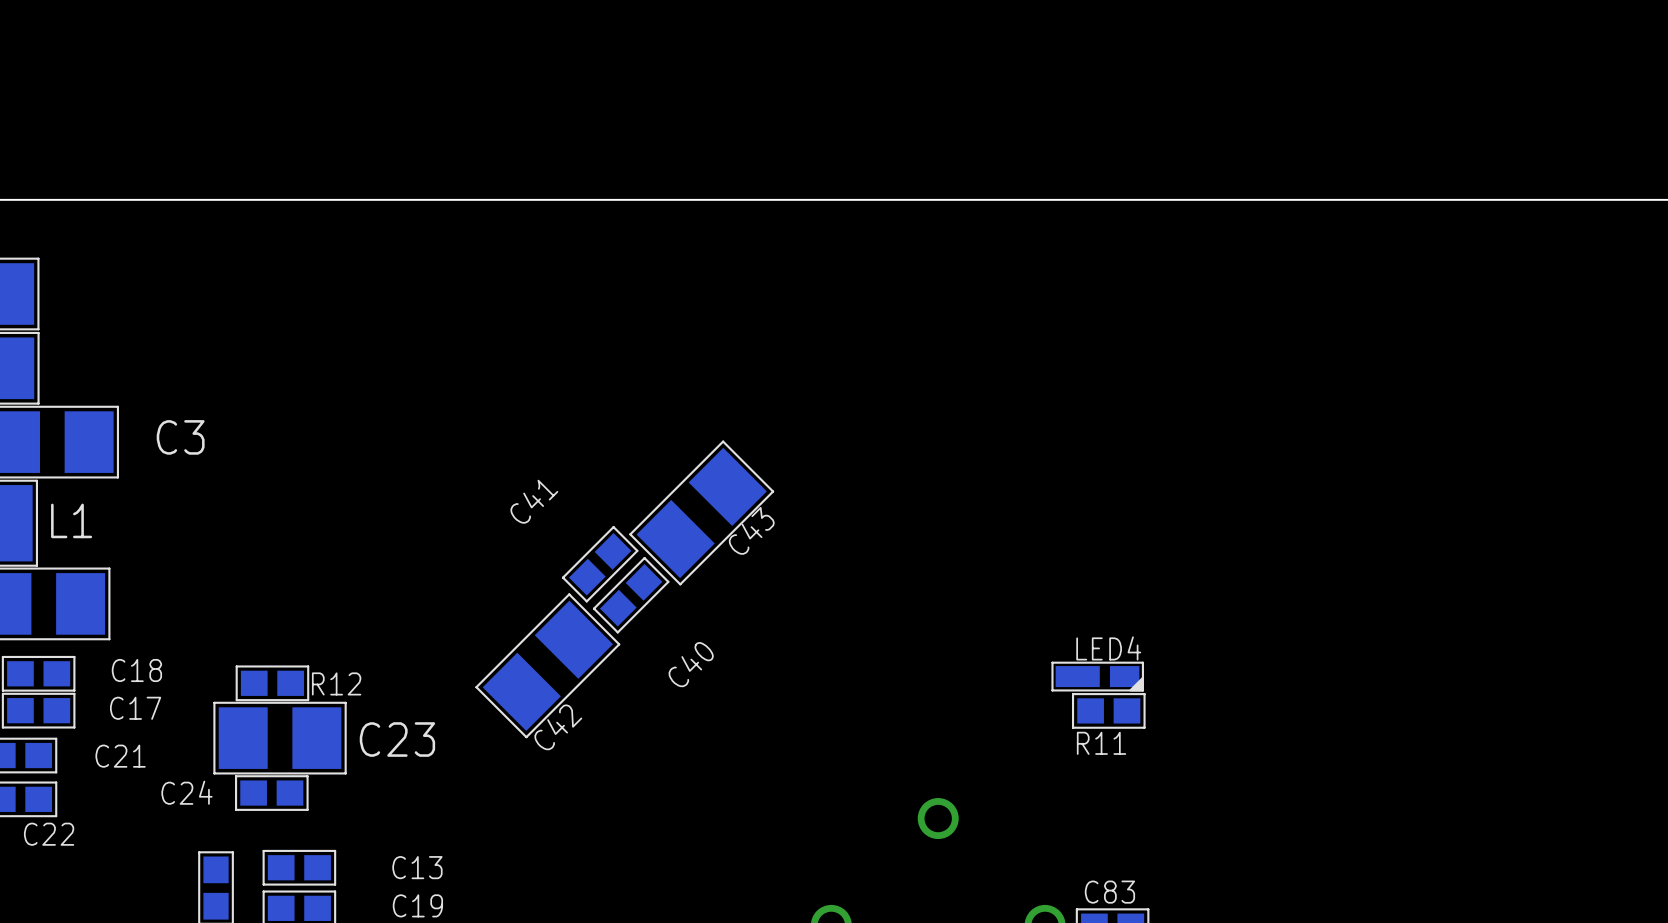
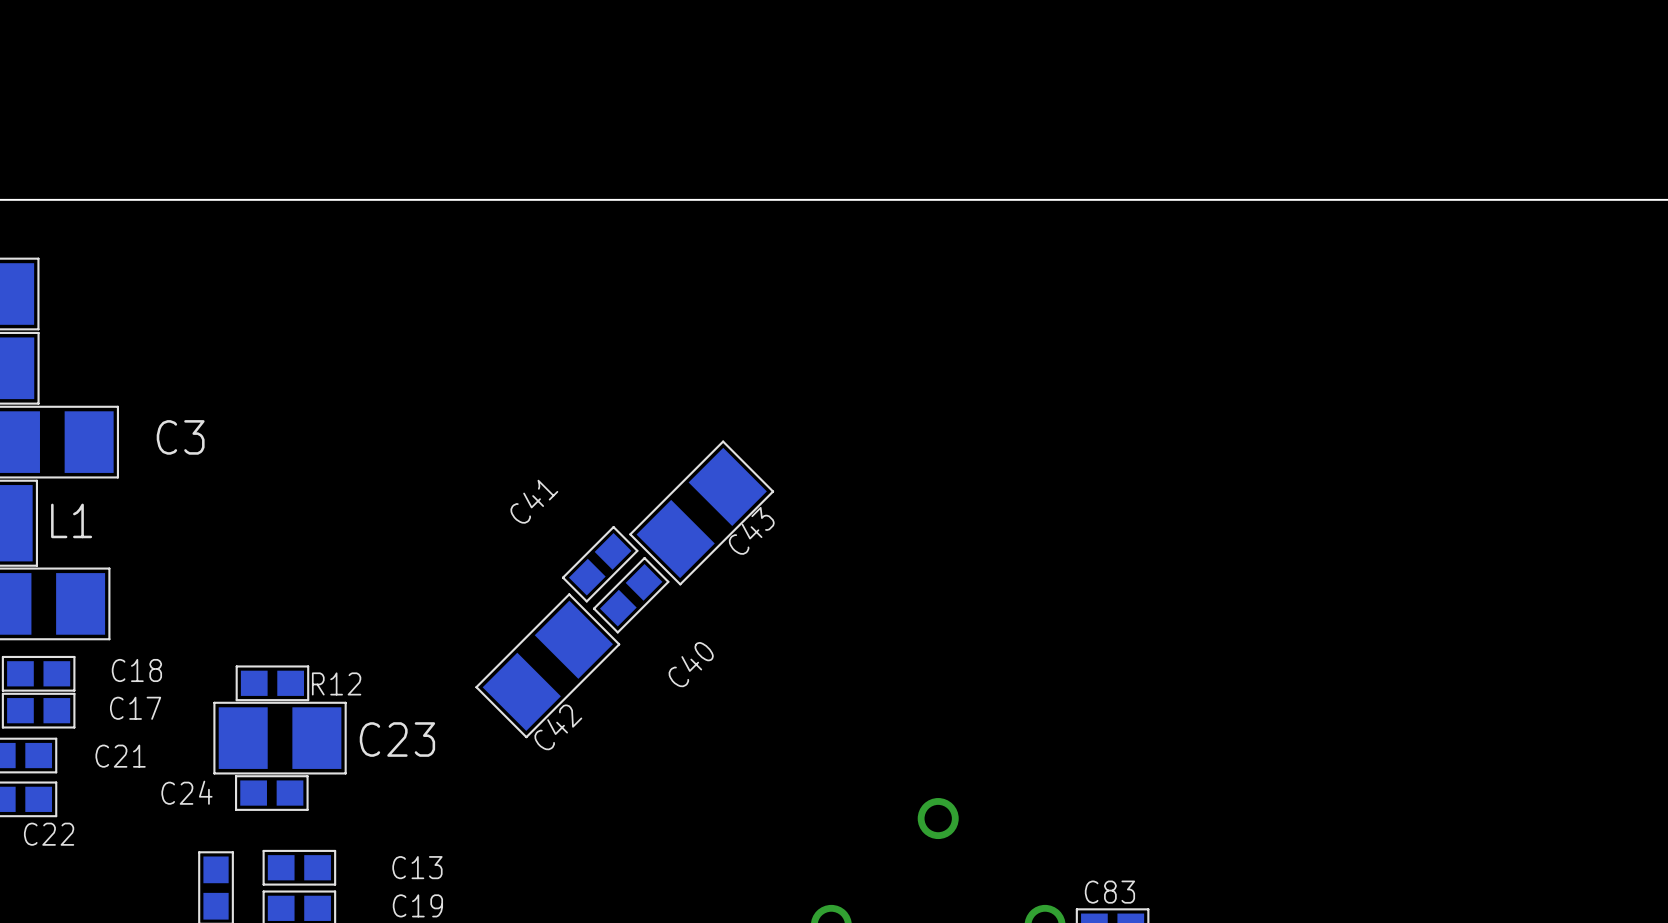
LED4: (1097, 676) -> none
R11: (1108, 710) -> none

